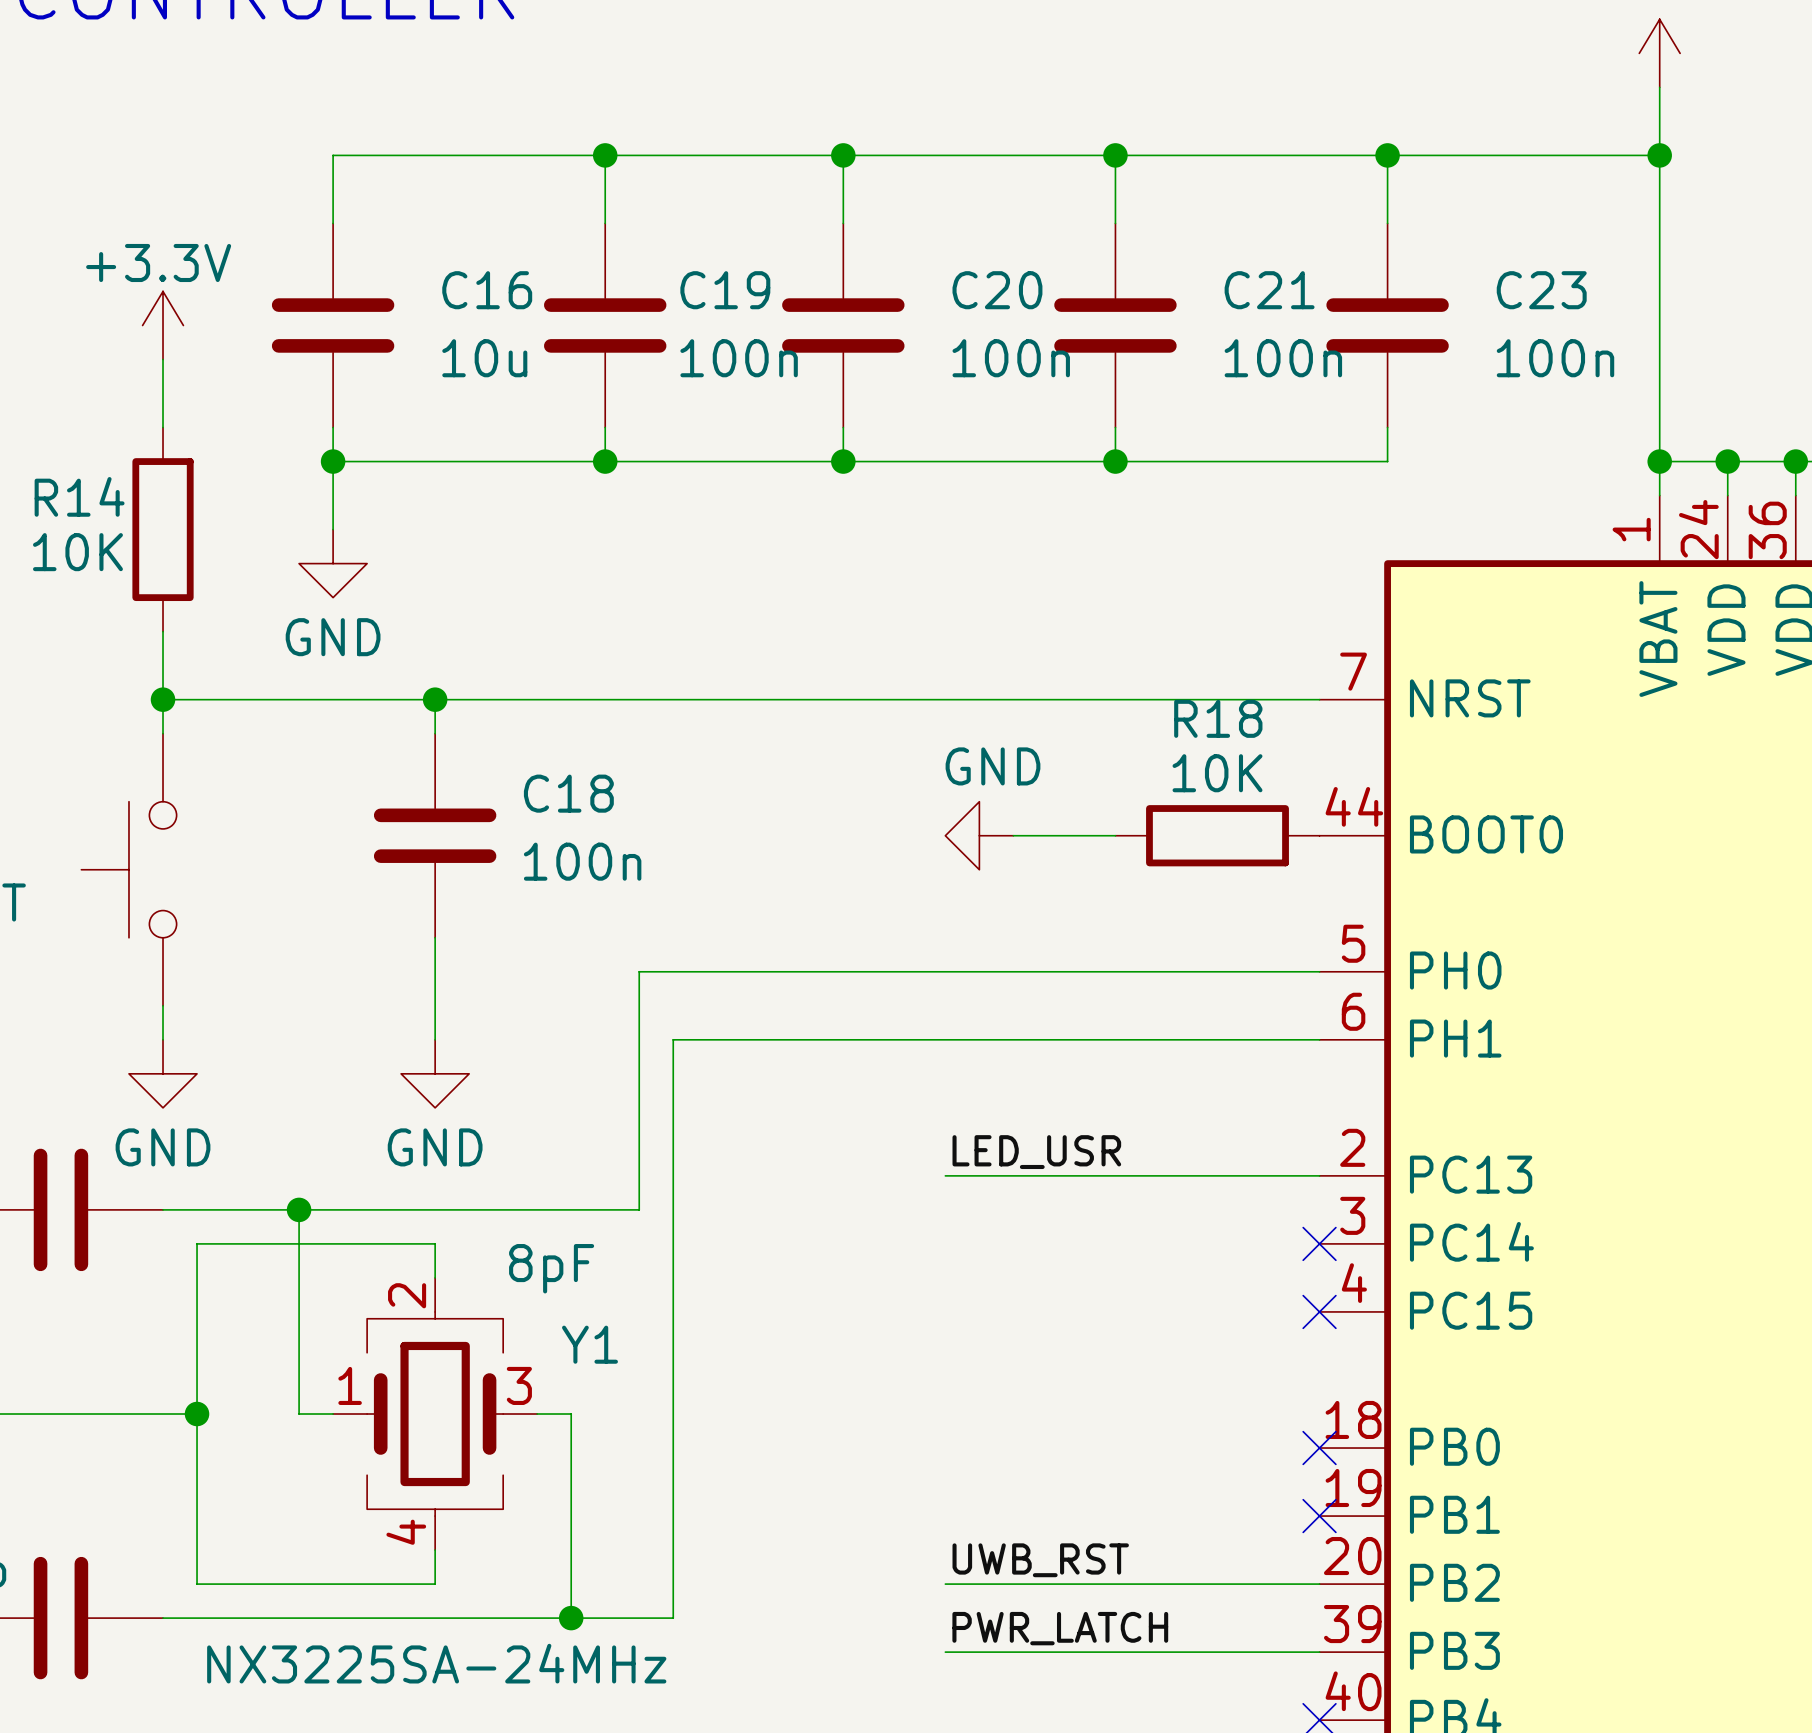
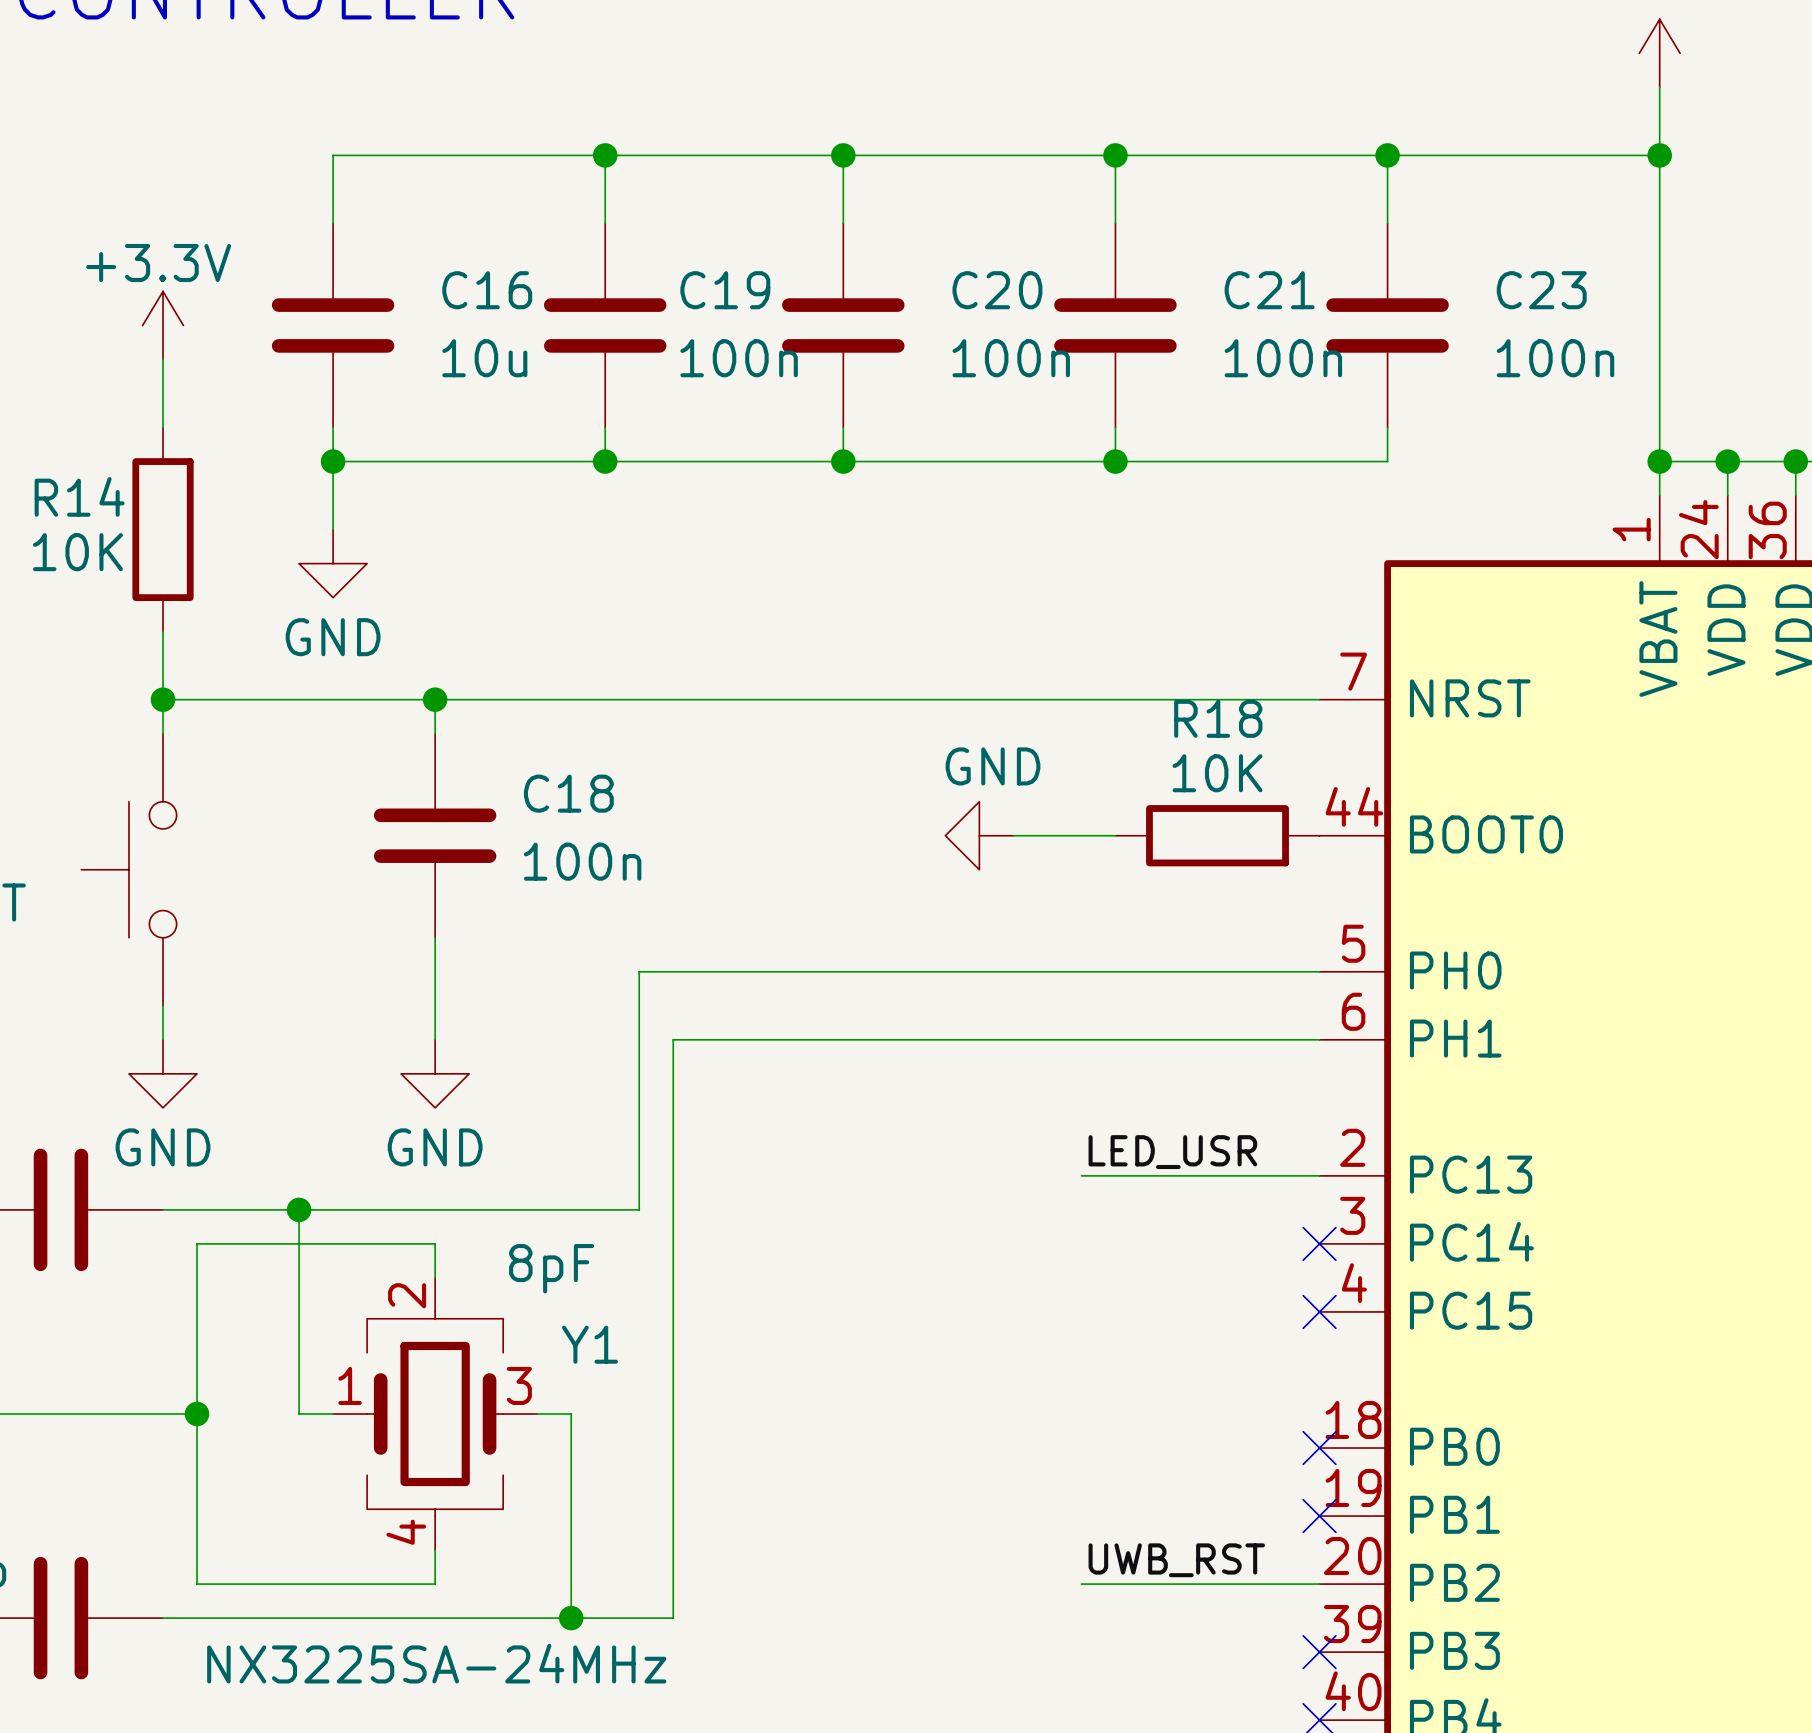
label position: LED_USR (1036, 1152) -> LED_USR (1172, 1152)
wire: (945, 1175) (1081, 1175) -> none
label position: UWB_RST (1040, 1560) -> UWB_RST (1176, 1560)
wire: (945, 1584) (1081, 1584) -> none
label: PWR_LATCH (1060, 1628) -> none
wire: (945, 1652) (1319, 1652) -> none
no-connect mark: none -> (1319, 1652)

